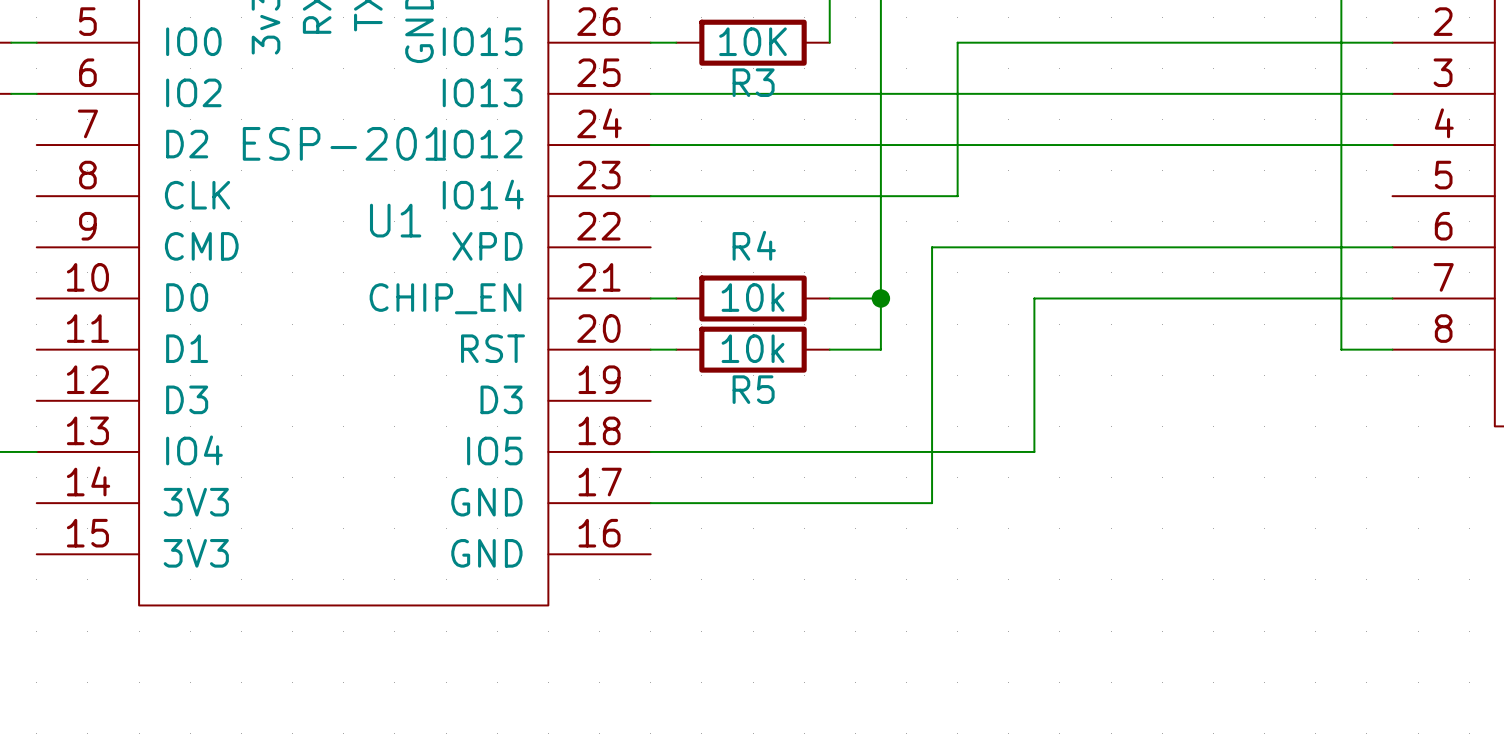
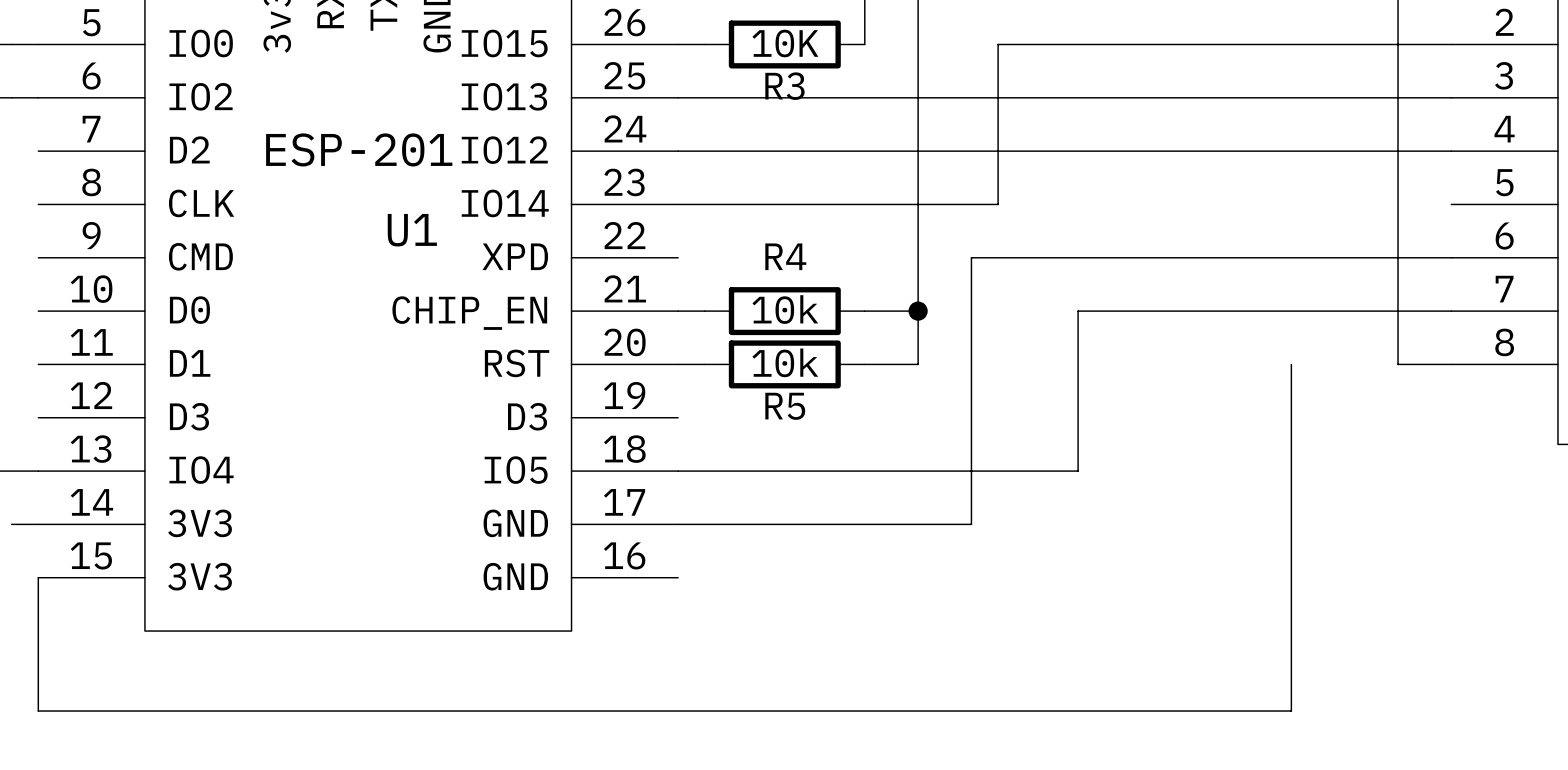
wire: none -> (1291, 364) (1291, 711) (38, 711) (38, 577)
wire: none -> (11, 524) (38, 524)

